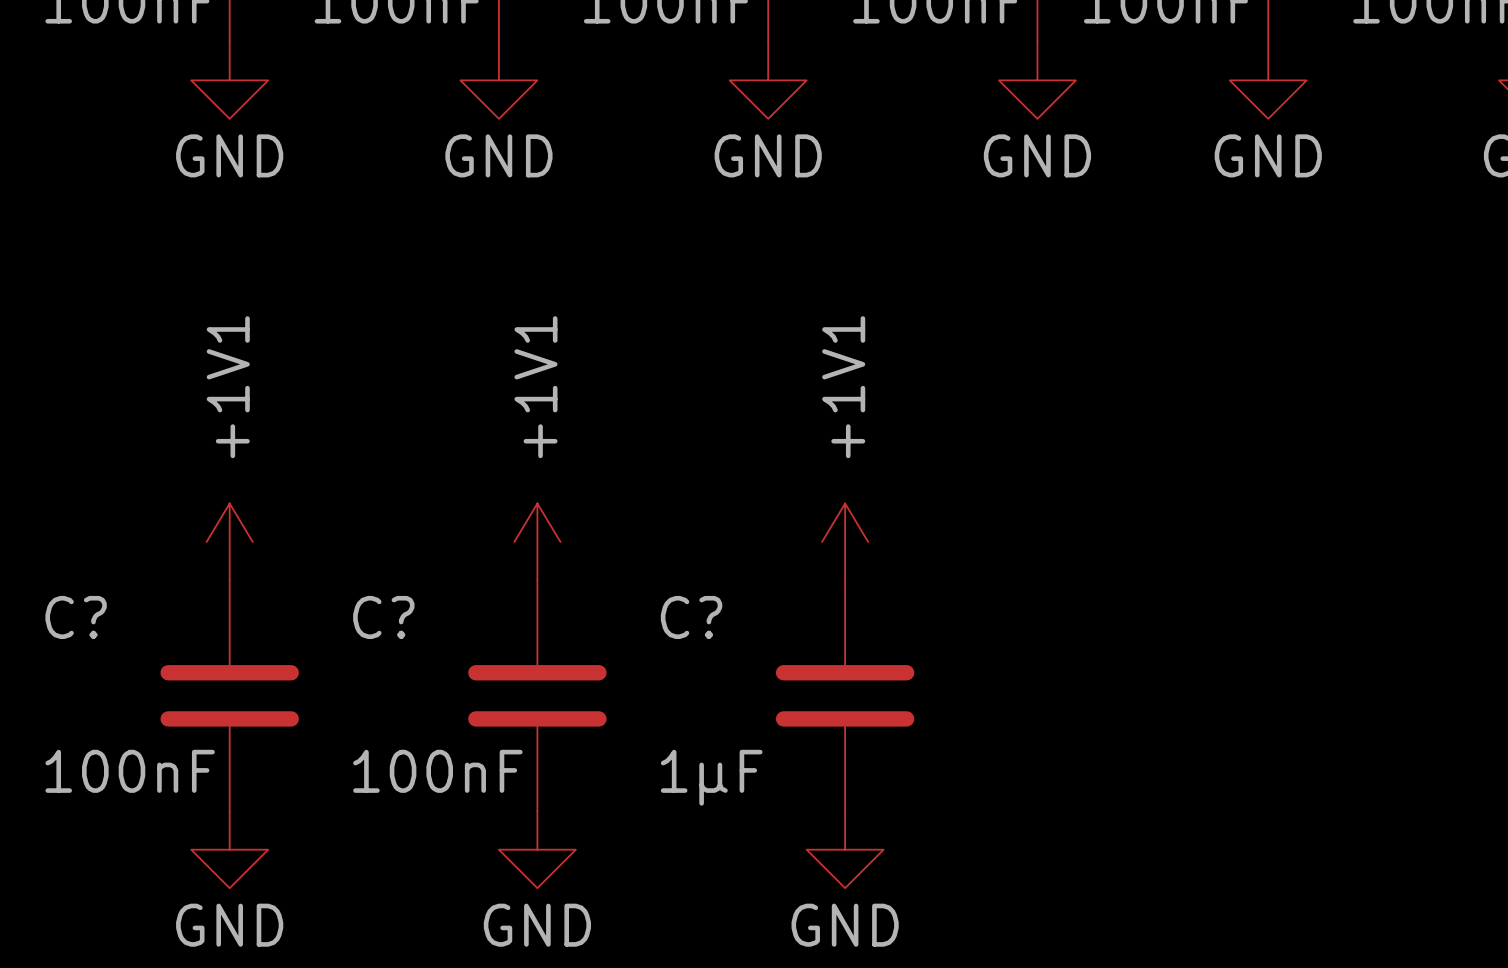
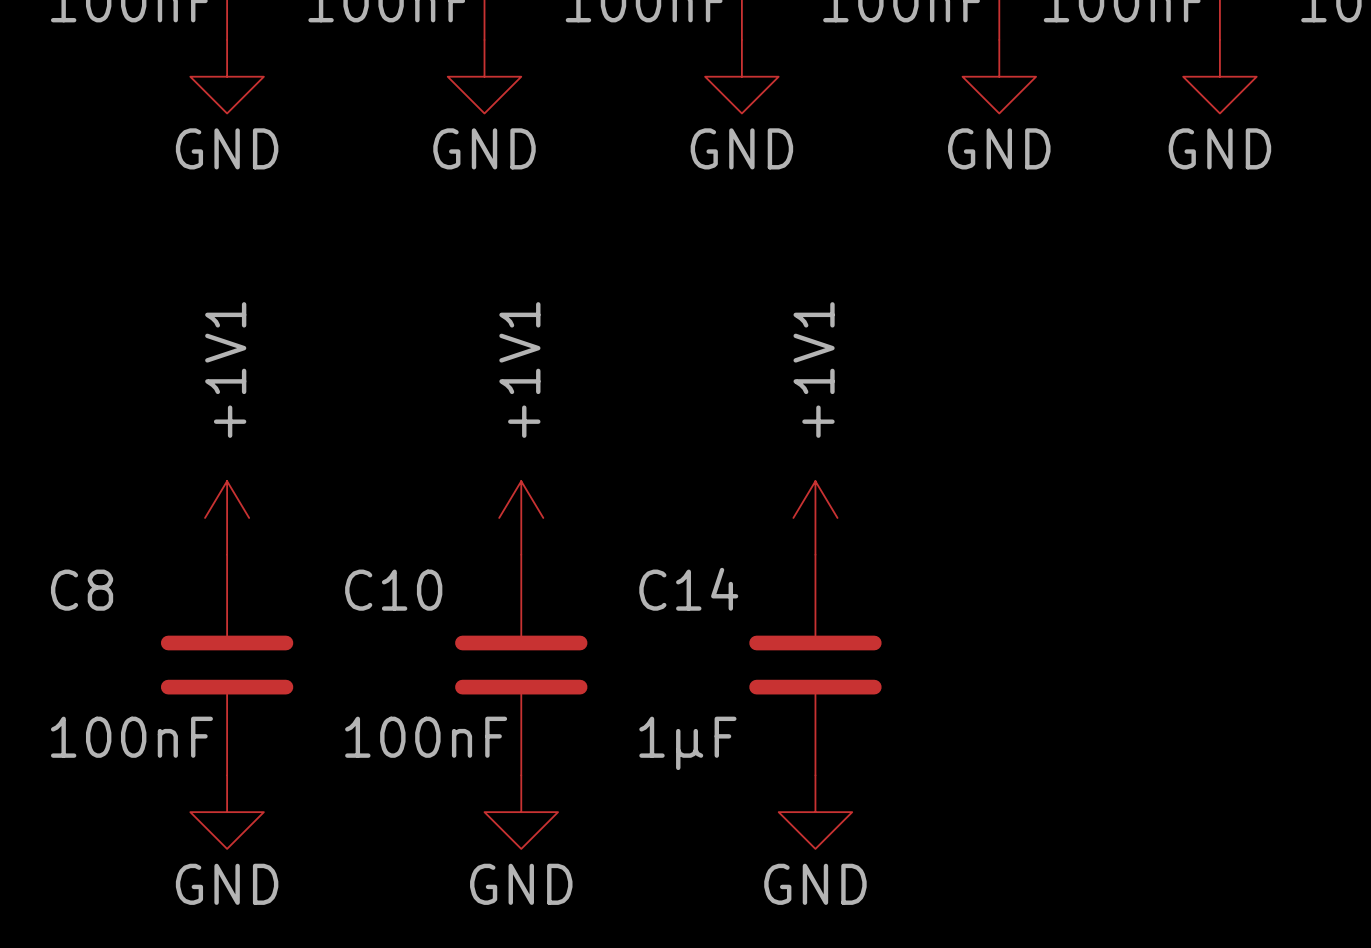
C? name: C? (76, 617) -> C8 (82, 590)
C? name: C? (383, 617) -> C10 (393, 590)
C? name: C? (691, 617) -> C14 (688, 589)

